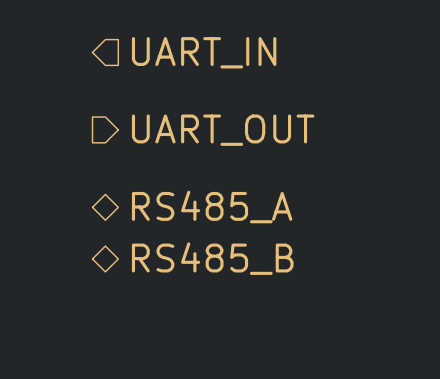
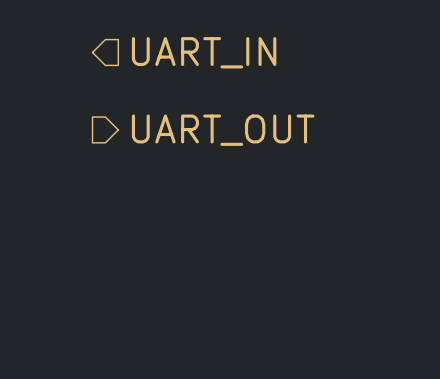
hierarchical label: RS485_A (212, 207) -> none
hierarchical label: RS485_B (212, 258) -> none

